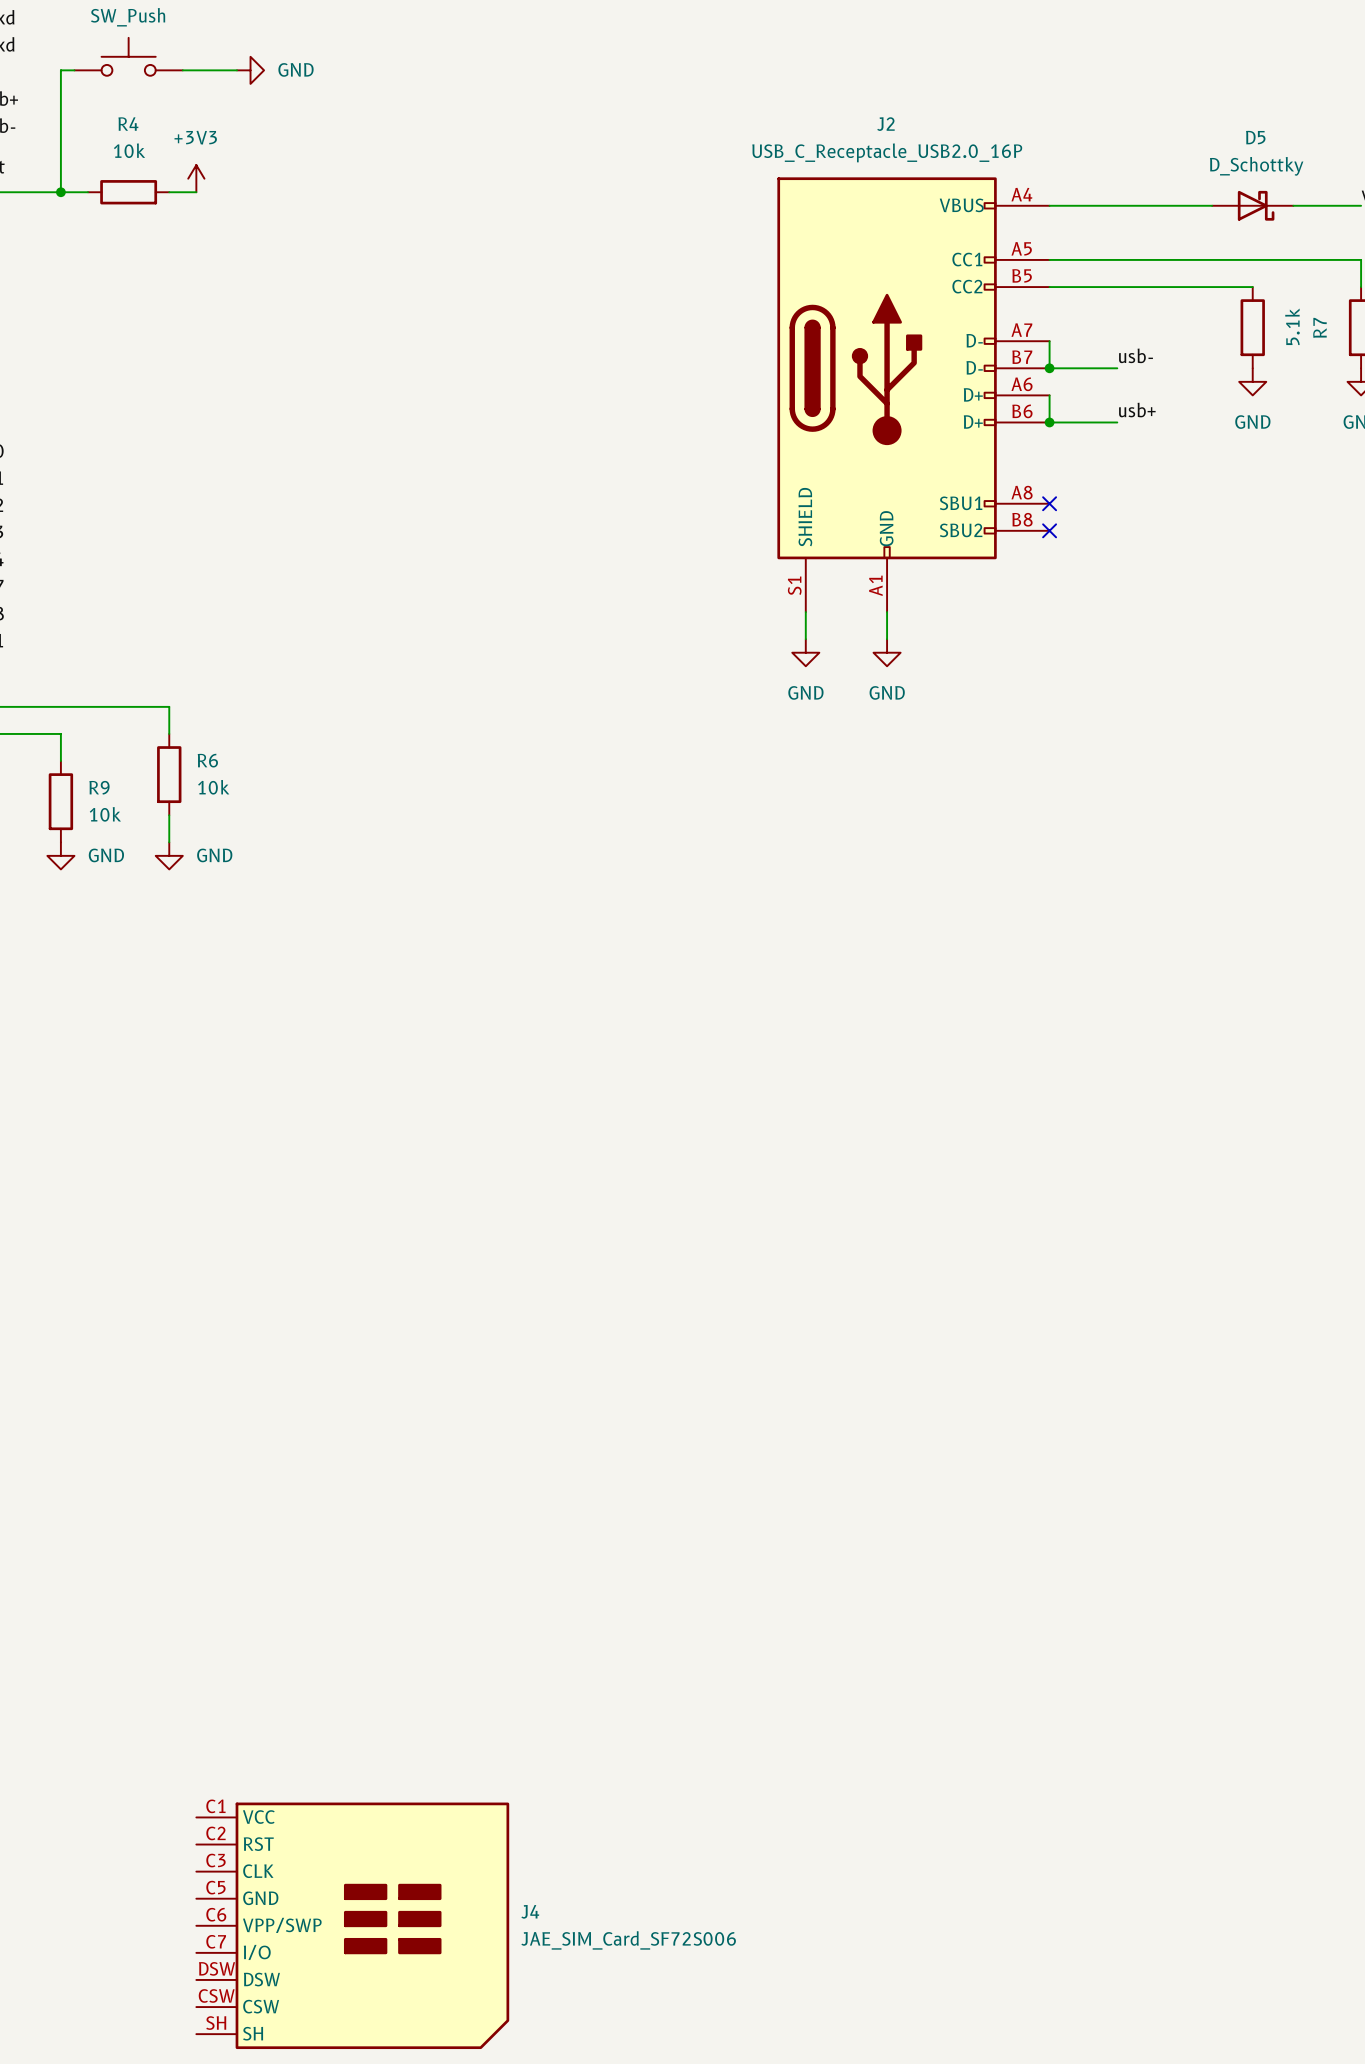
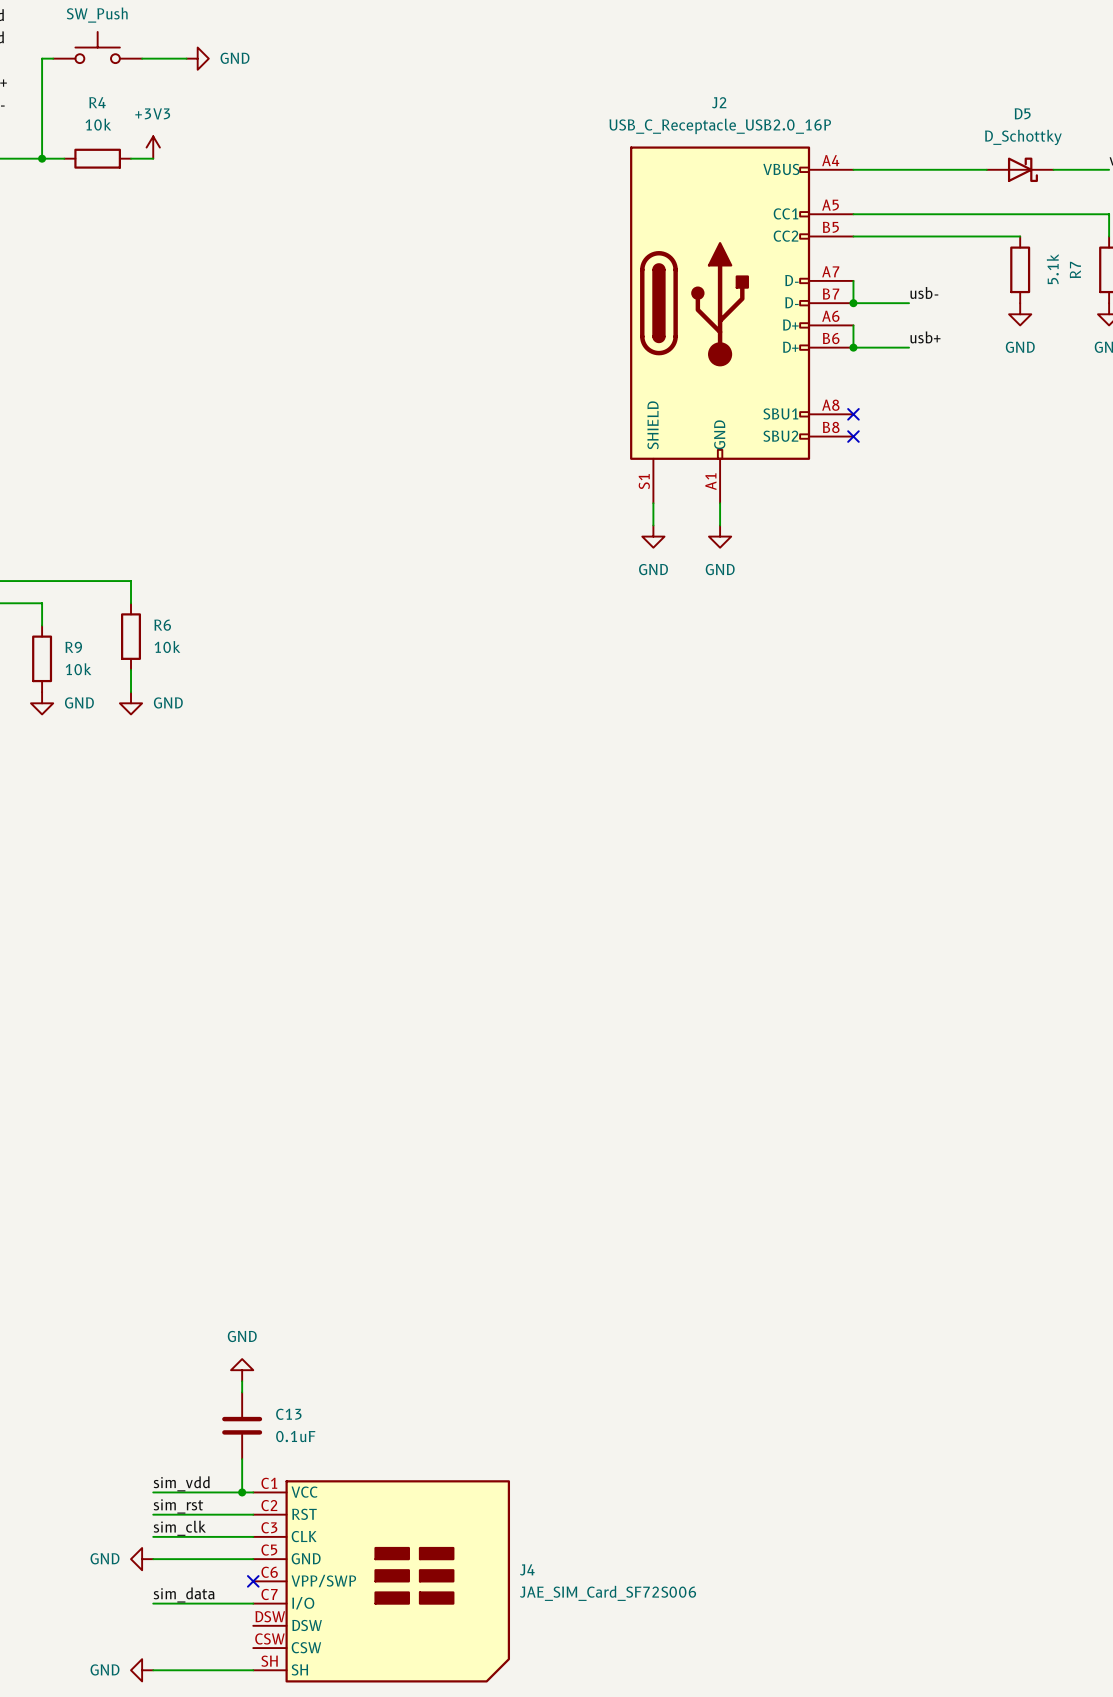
power symbol: none -> GND (242, 1370)
wire: none -> (242, 1381) (242, 1392)
C13: none -> 0.1uF (242, 1425)
wire: none -> (242, 1459) (242, 1492)
label: none -> sim_vdd (181, 1483)
junction: none -> (242, 1492)
label: none -> sim_rst (178, 1506)
label: none -> sim_clk (179, 1528)
power symbol: none -> GND (142, 1559)
no-connect mark: none -> (253, 1581)
J4 position: (352, 1925) -> (381, 1581)
label: none -> sim_data (184, 1594)
power symbol: none -> GND (142, 1670)

